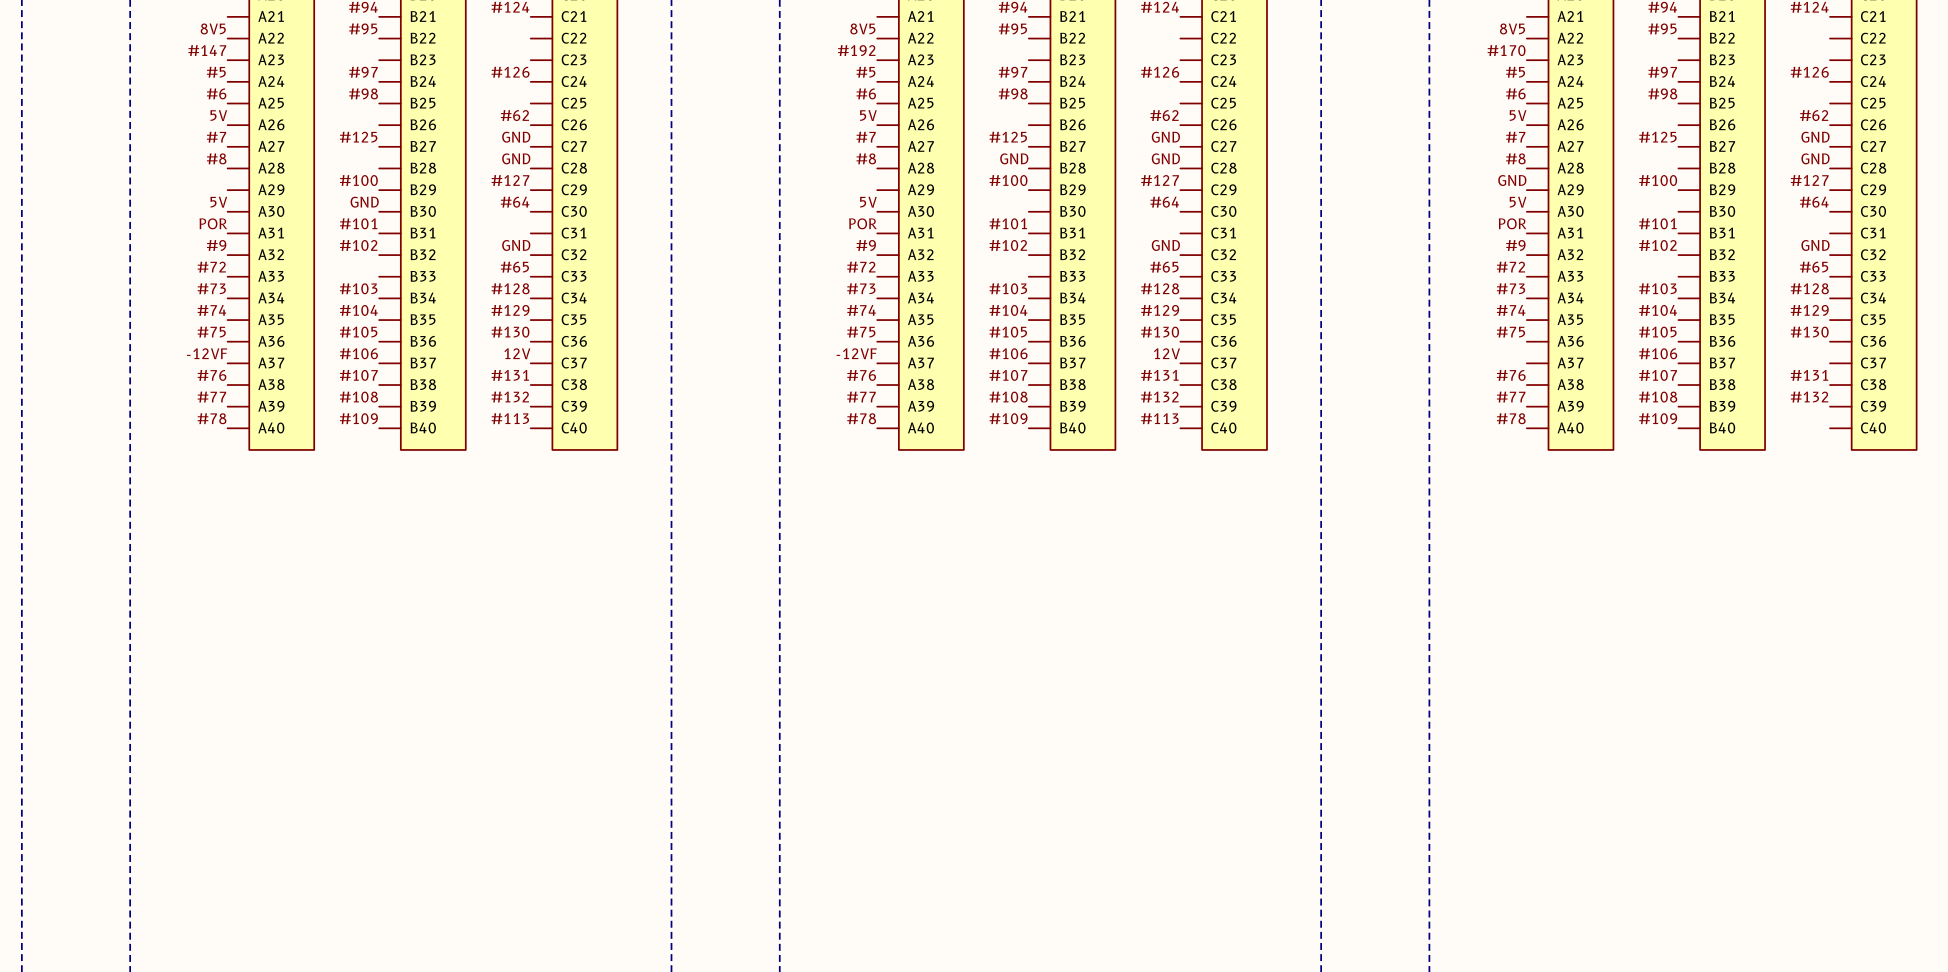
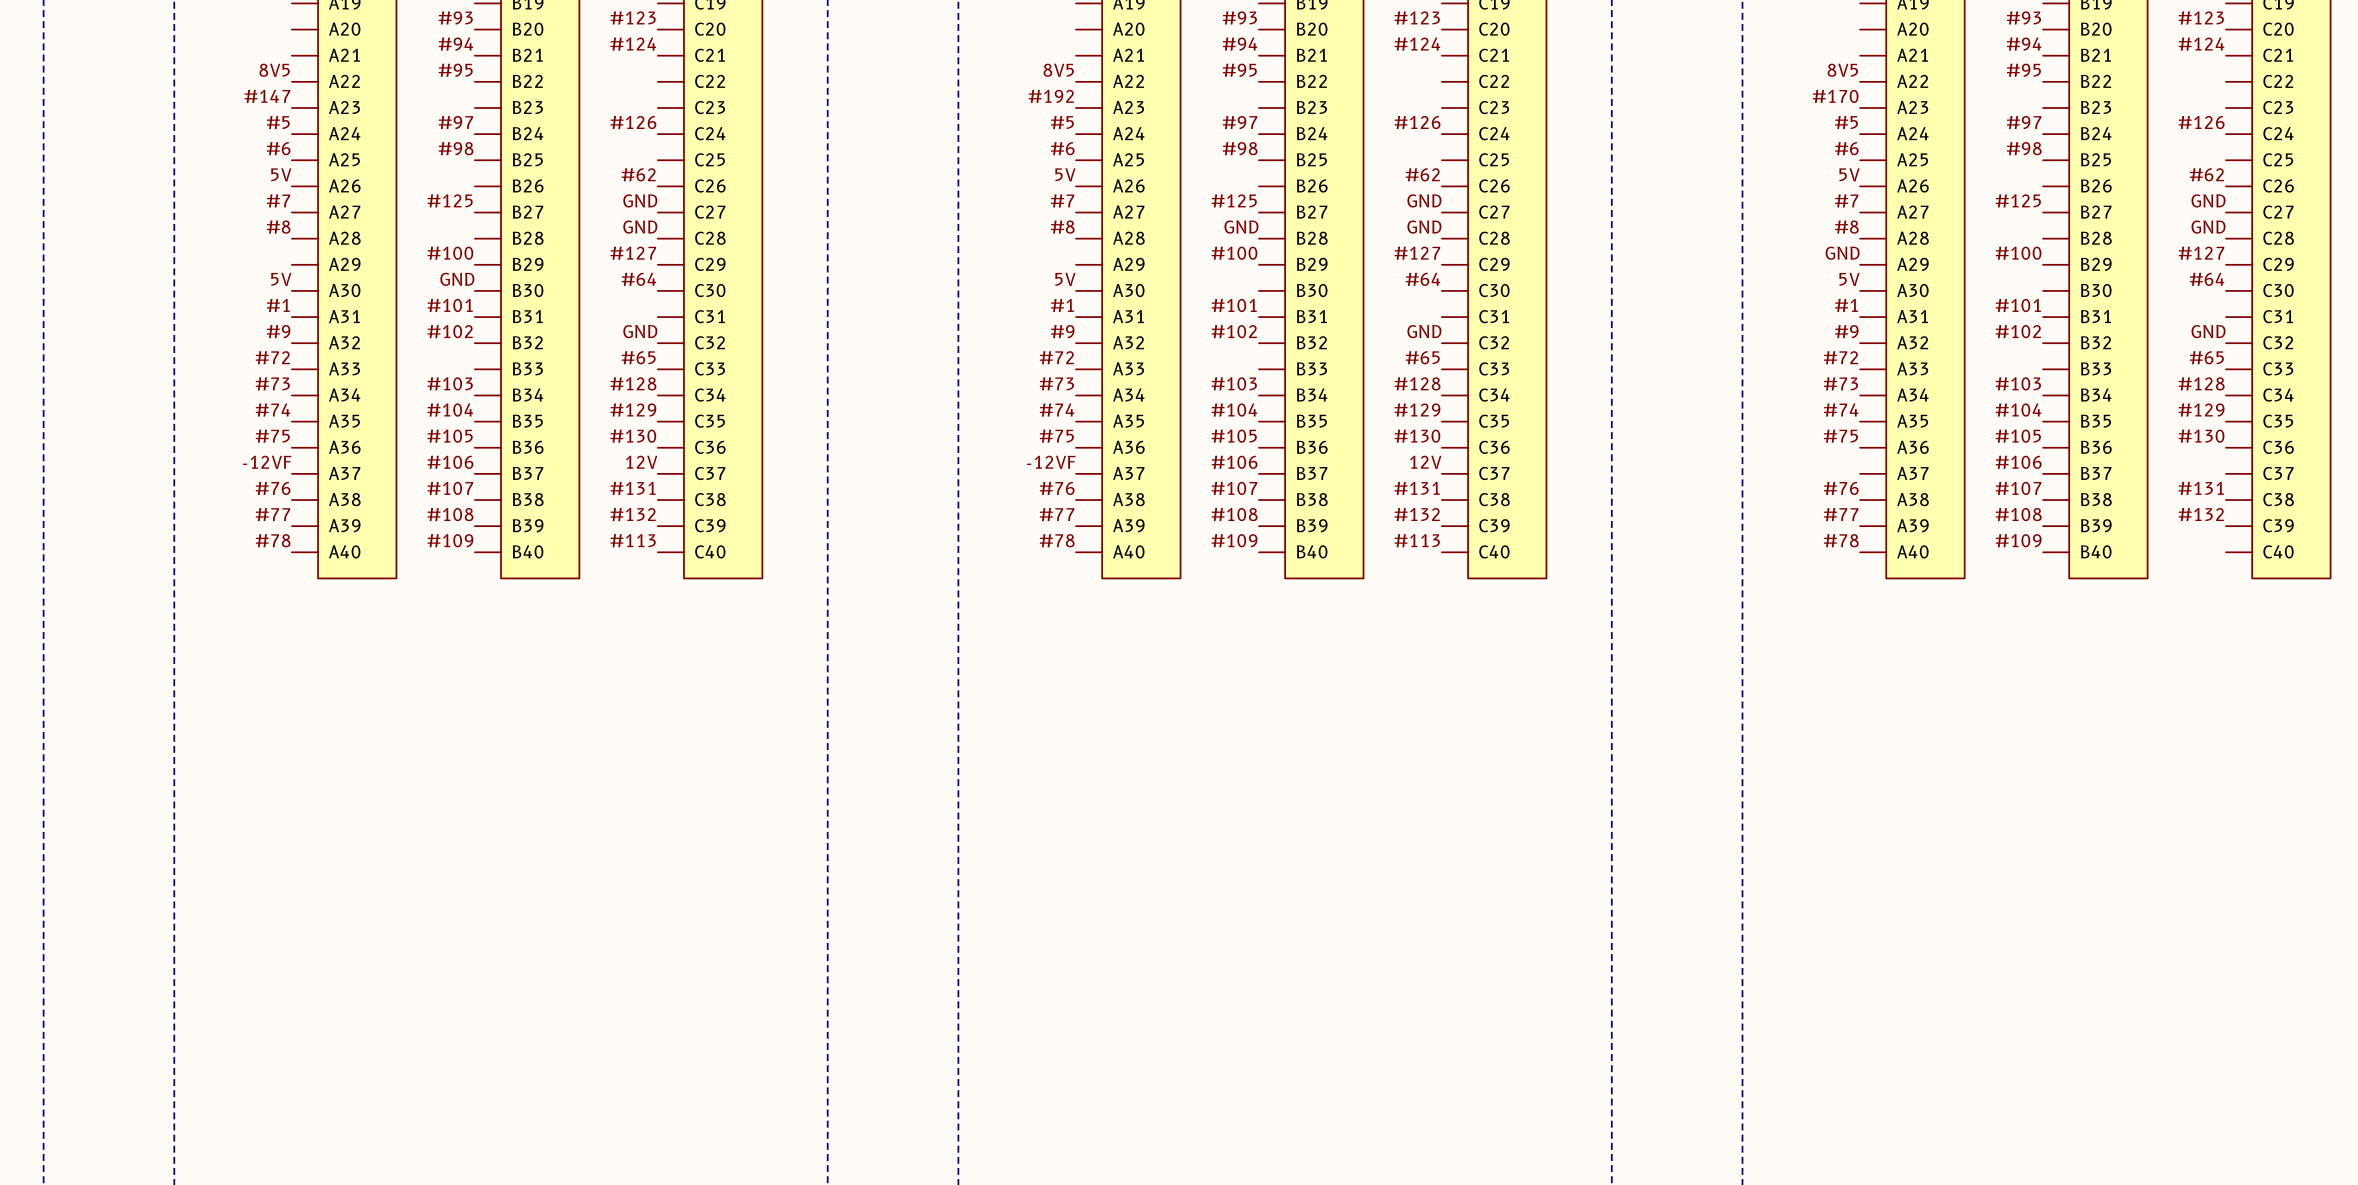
label: POR (213, 223) -> #1 (278, 305)
label: POR (862, 223) -> #1 (1062, 305)
label: POR (1512, 223) -> #1 (1846, 305)

